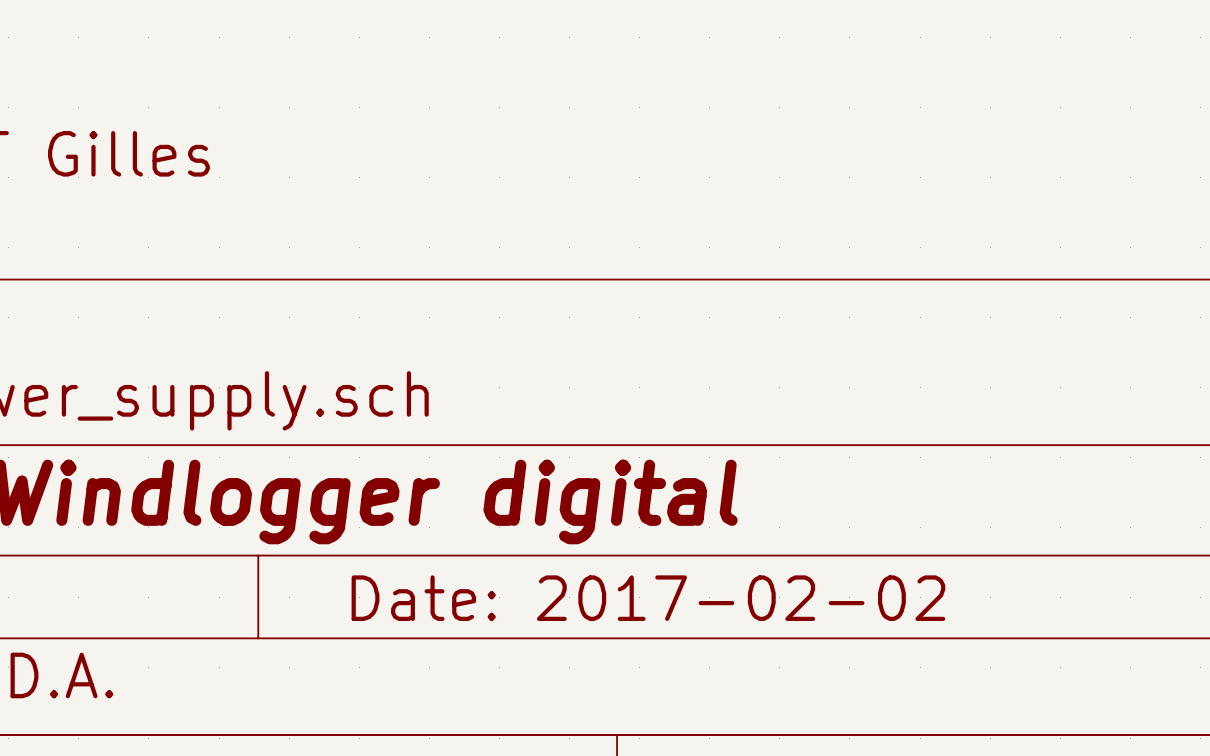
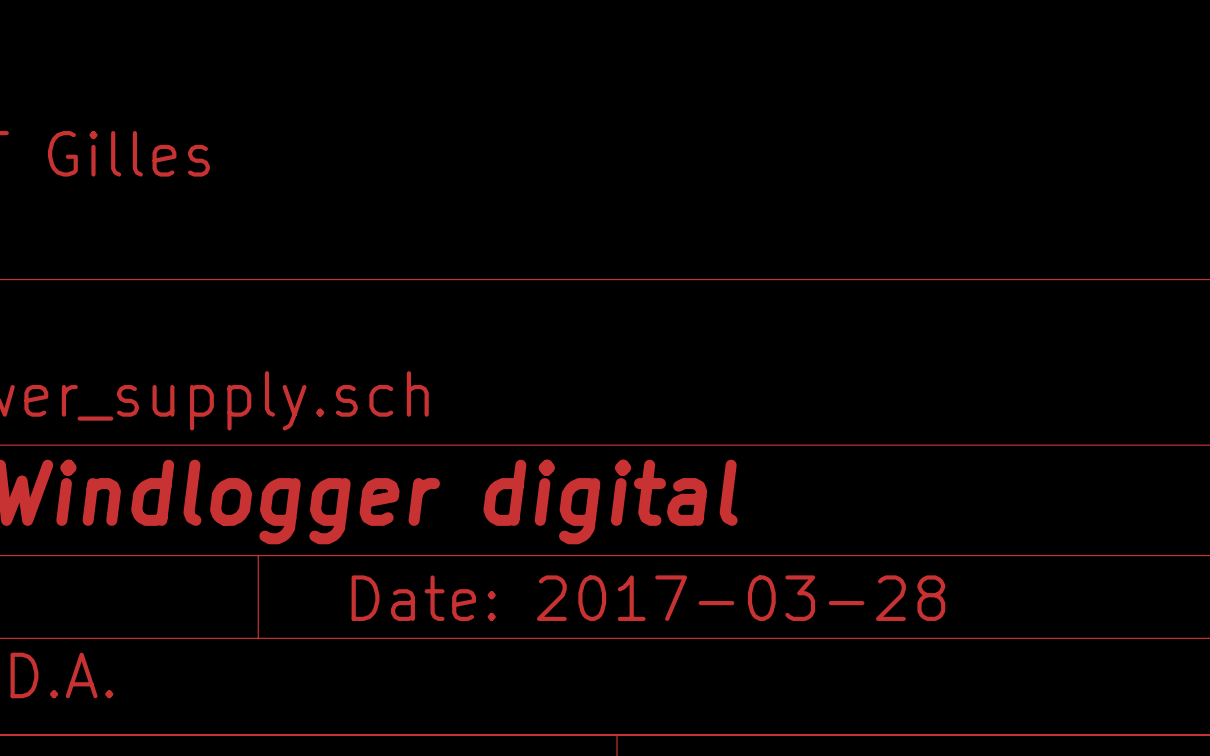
title block: Date: 2017-02-02 (648, 598) -> Date: 2017-03-28 (648, 598)

